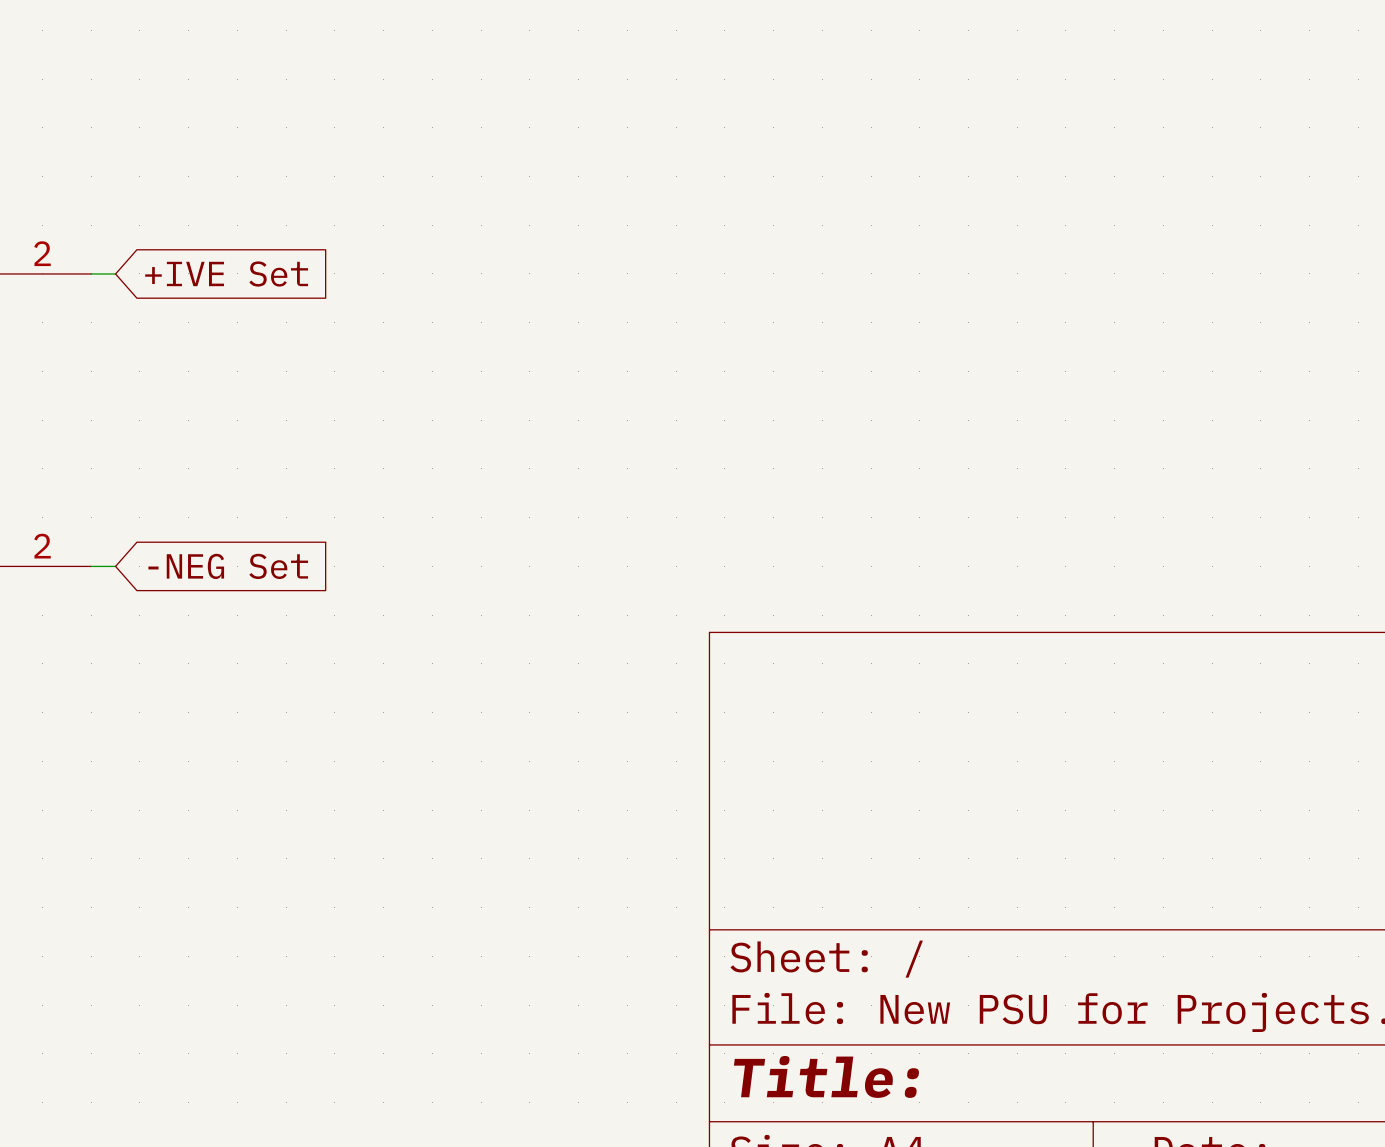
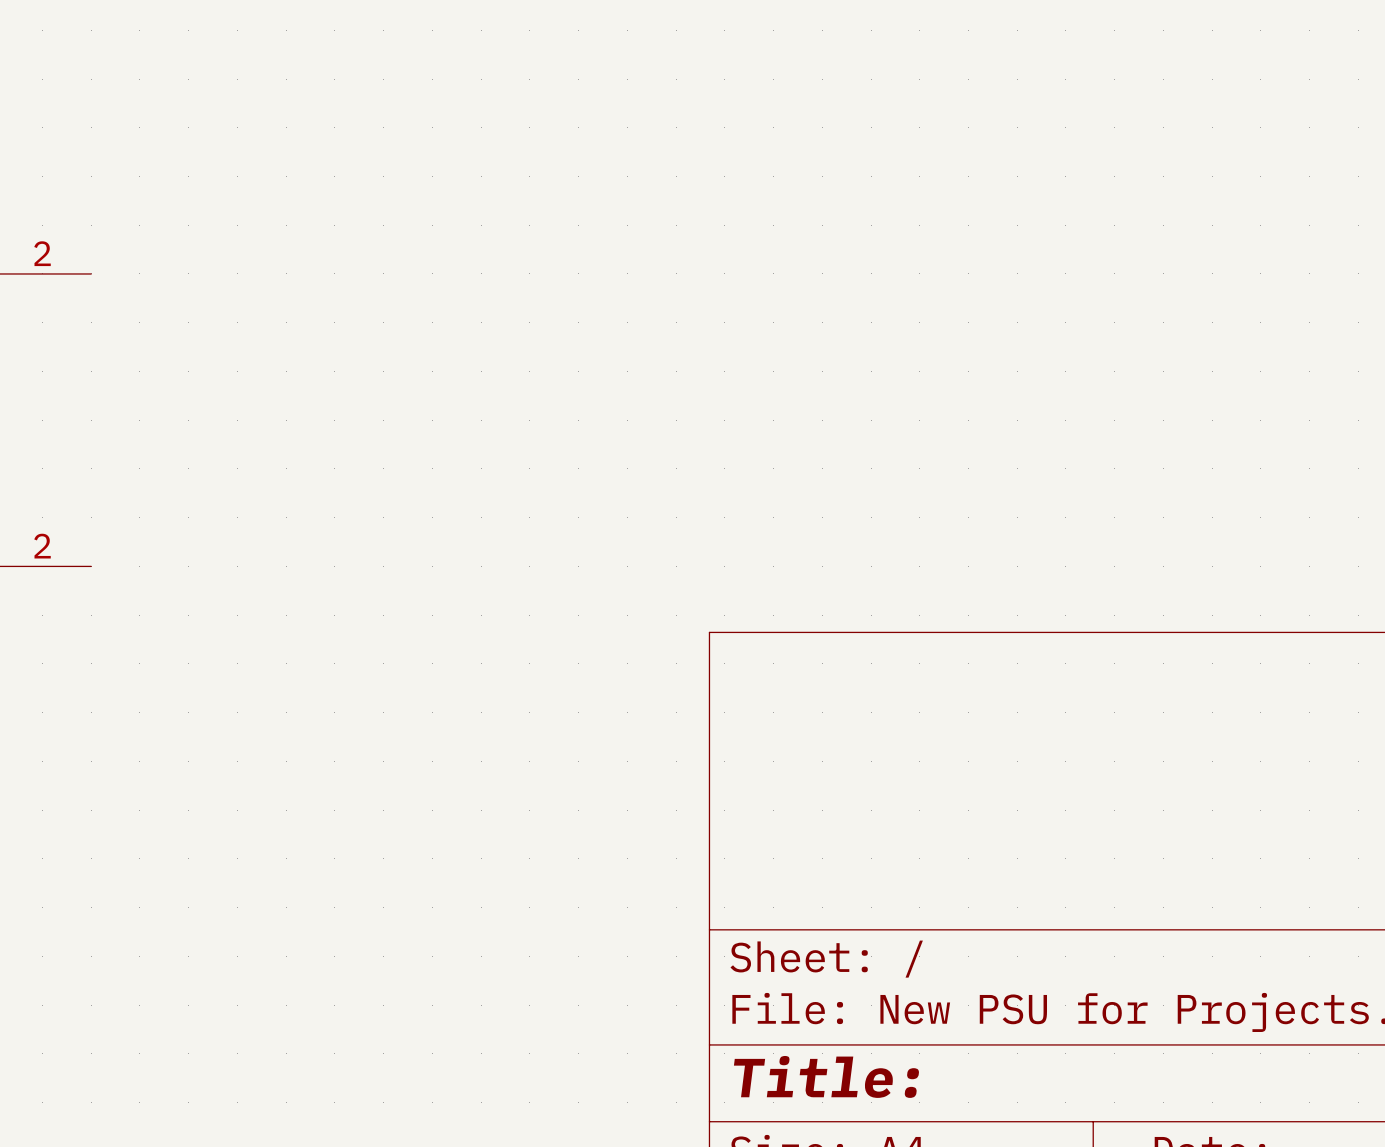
wire: (91, 273) (115, 273) -> none
global label: +IVE Set (226, 273) -> none
wire: (91, 566) (115, 566) -> none
global label: -NEG Set (228, 566) -> none

